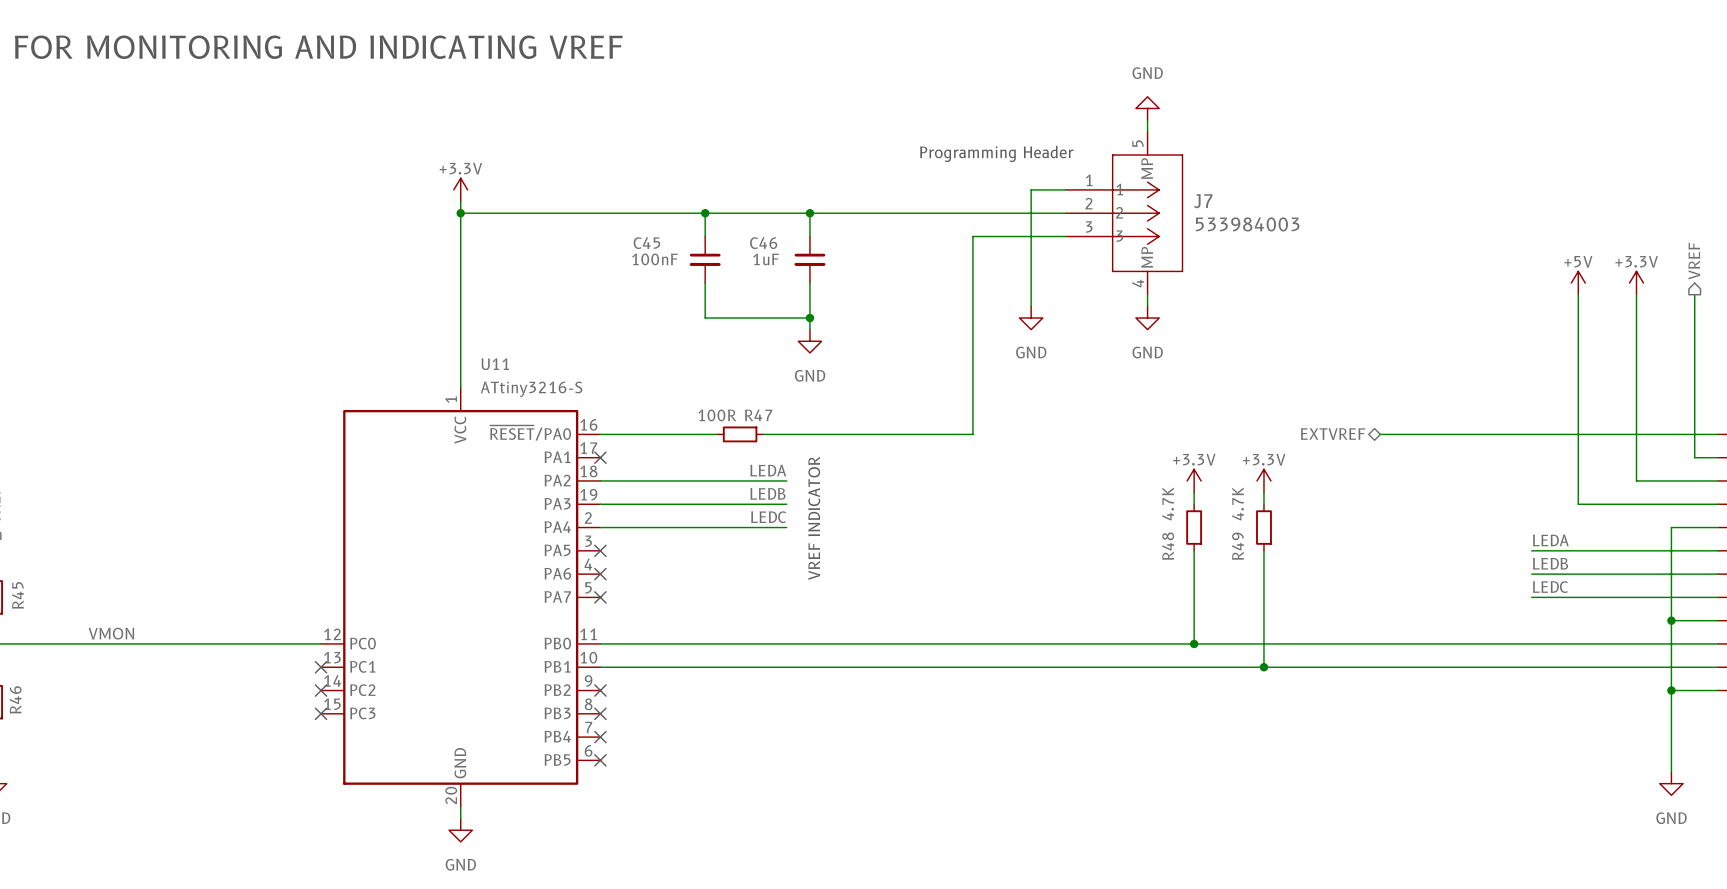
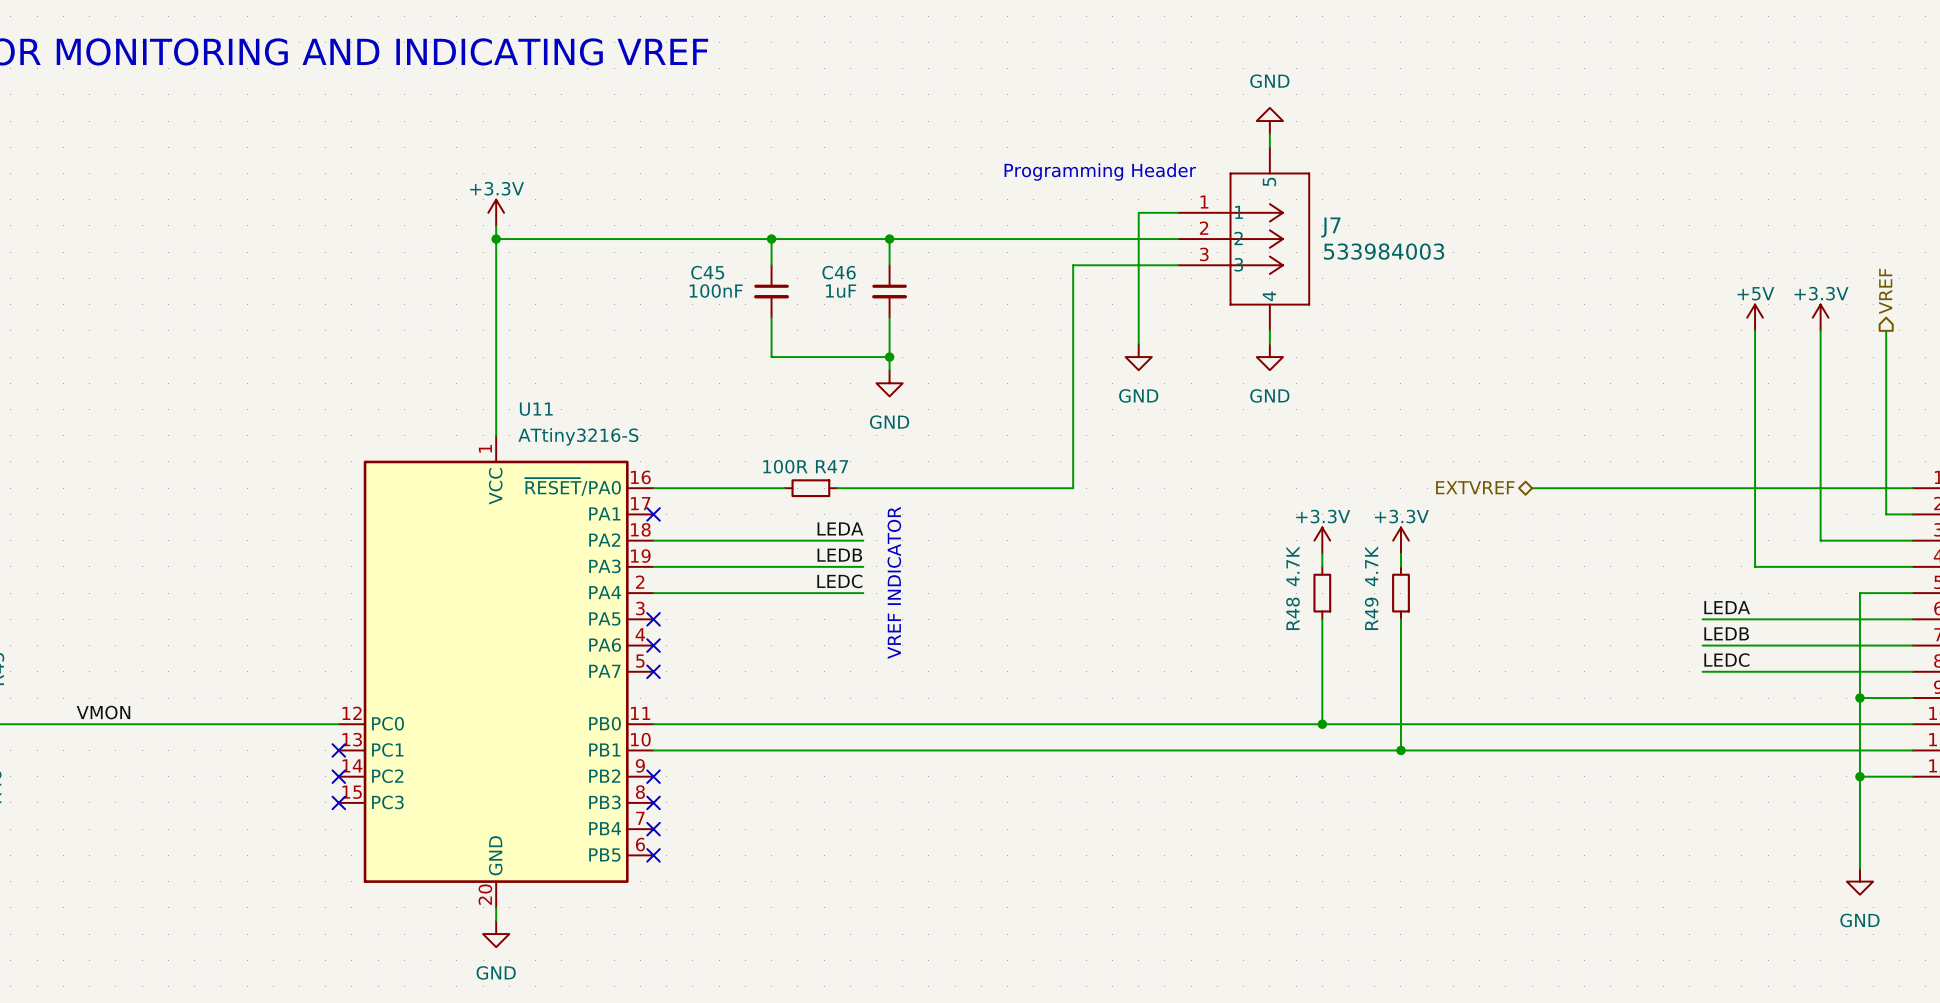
J7 pin number: 5 (1138, 143) -> none
J7 pin name: MP (1147, 168) -> 5 (1269, 181)
J7 pin name: MP (1147, 257) -> 4 (1269, 296)
J7 pin number: 4 (1137, 283) -> none

